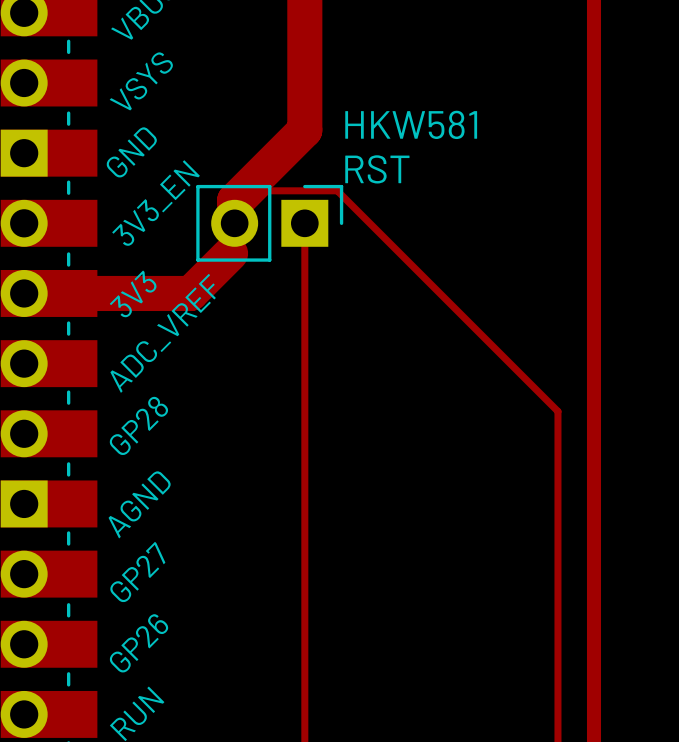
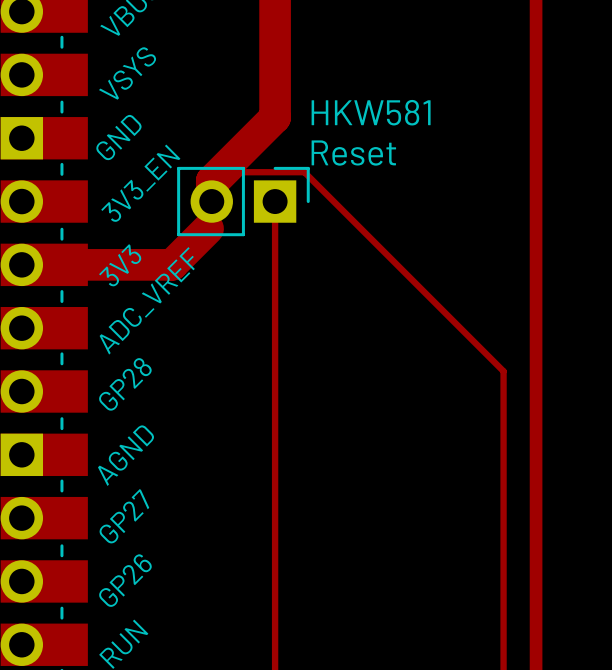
text: RST (377, 169) -> Reset (353, 153)

